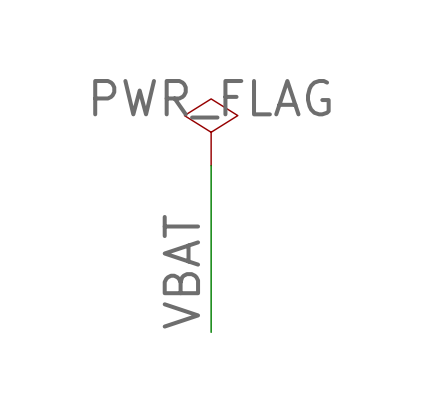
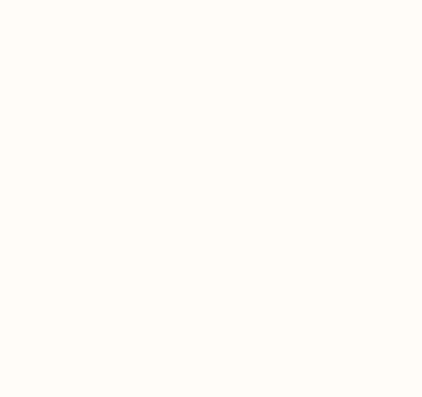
power symbol: PWR_FLAG (211, 132) -> none
wire: (211, 165) (211, 332) -> none
label: VBAT (181, 271) -> none

